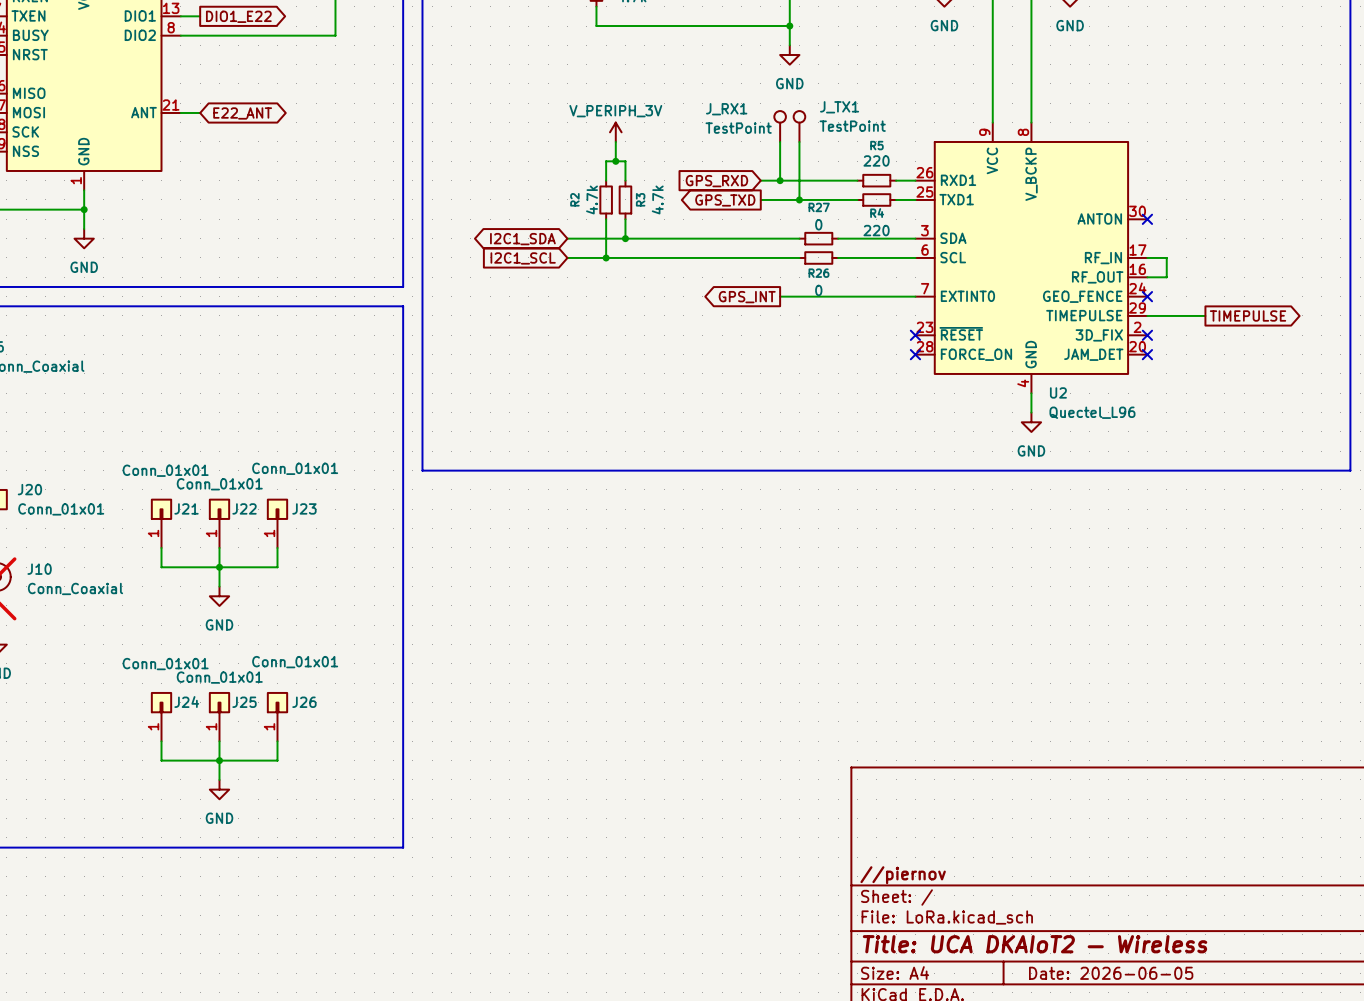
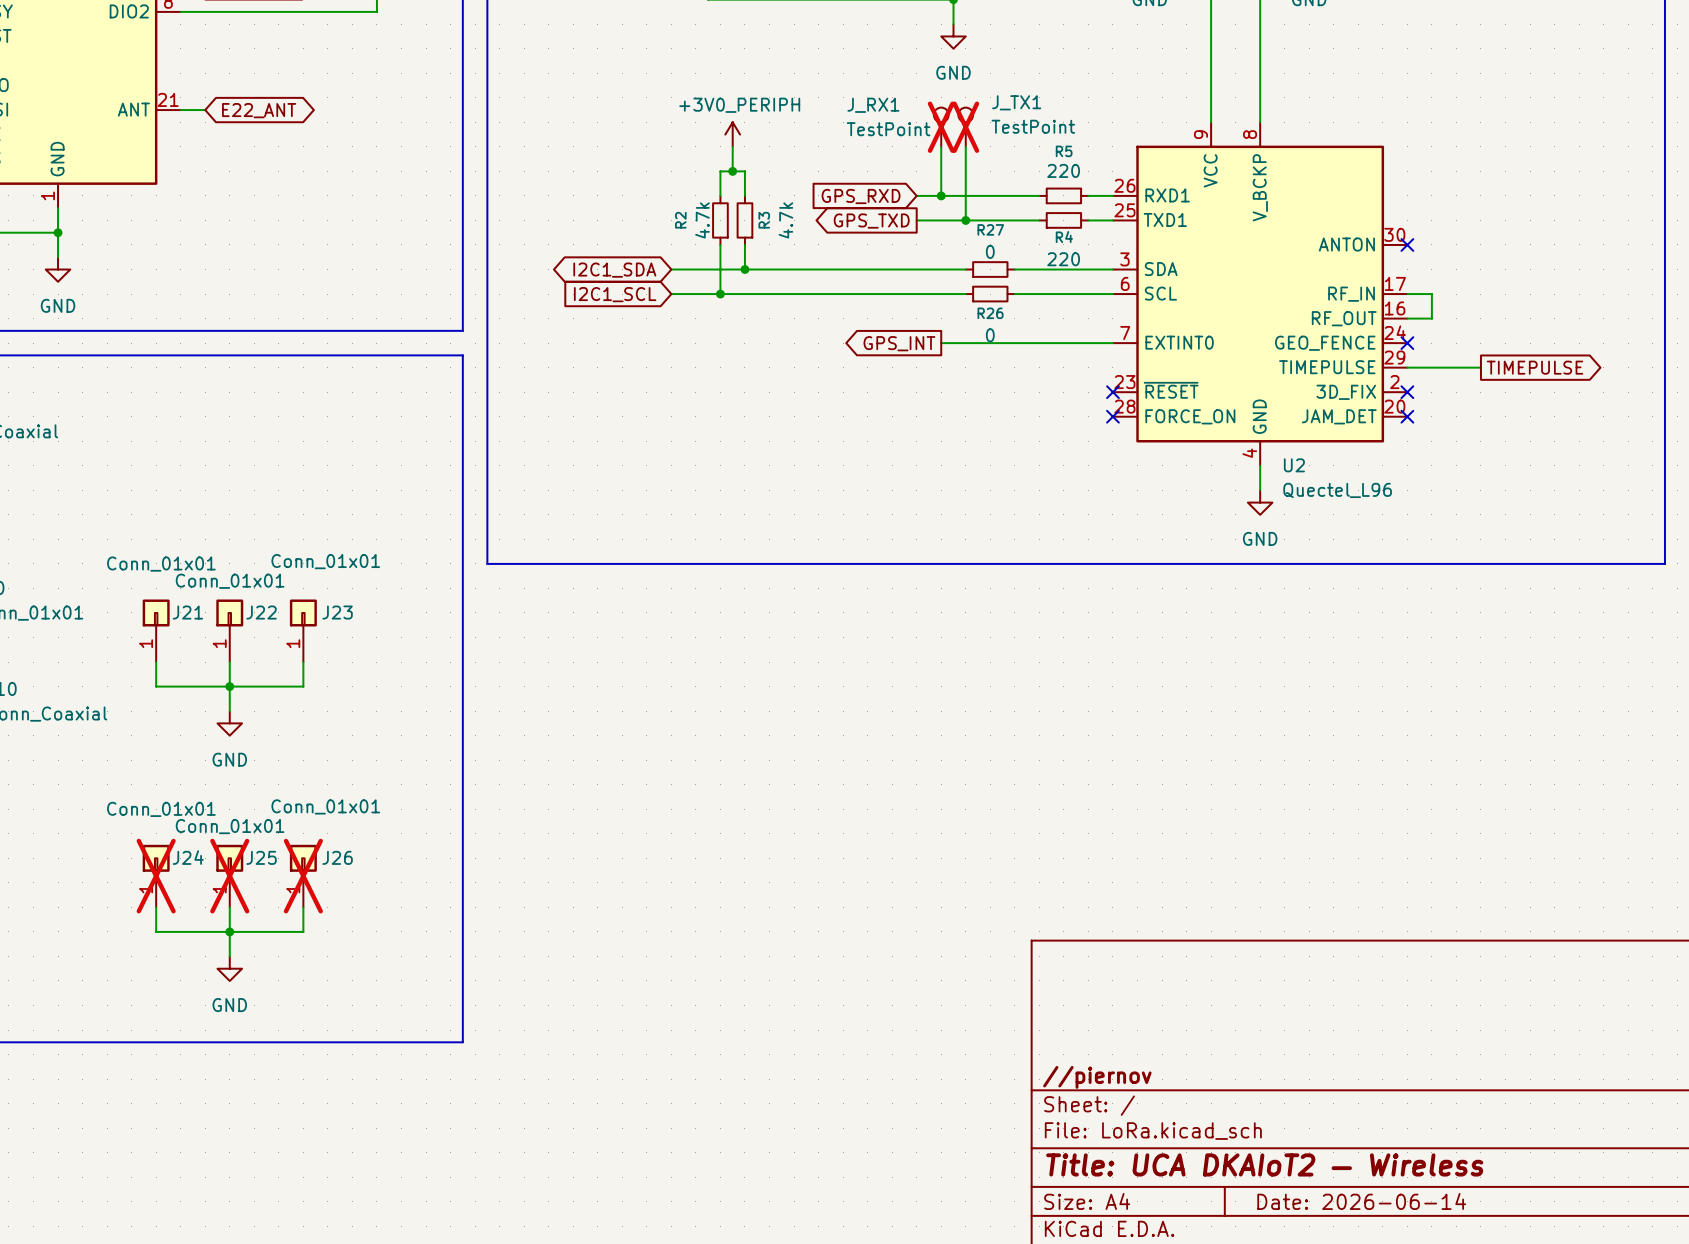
J_RX1 do-not-place cross: none -> (941, 127)
J_TX1 do-not-place cross: none -> (965, 127)
power symbol: V_PERIPH_3V (615, 132) -> +3V0_PERIPH (732, 134)
J24 do-not-place cross: none -> (156, 876)
J25 do-not-place cross: none -> (229, 876)
J26 do-not-place cross: none -> (303, 876)
title block: Date: 2026-06-05 (1111, 973) -> Date: 2026-06-14 (1361, 1201)

